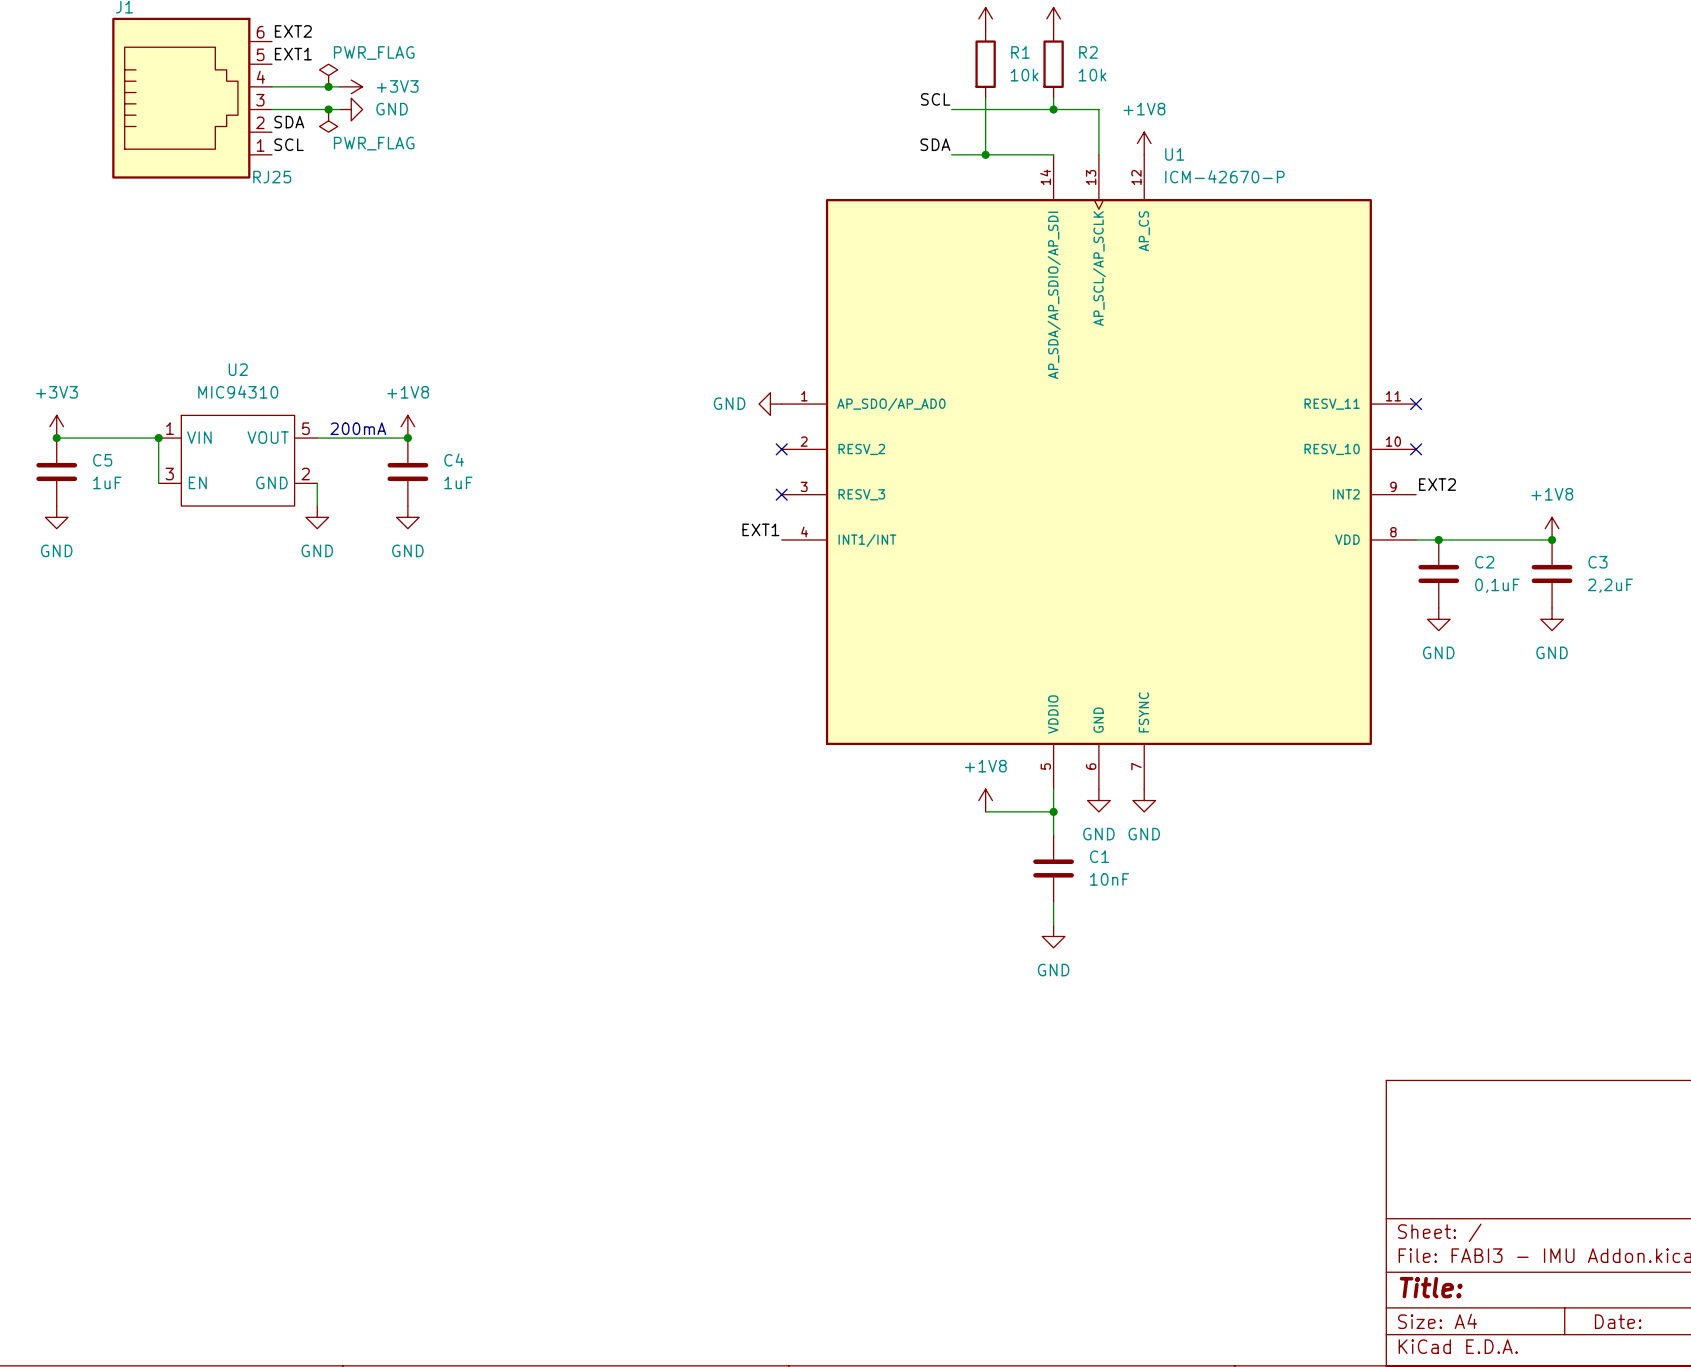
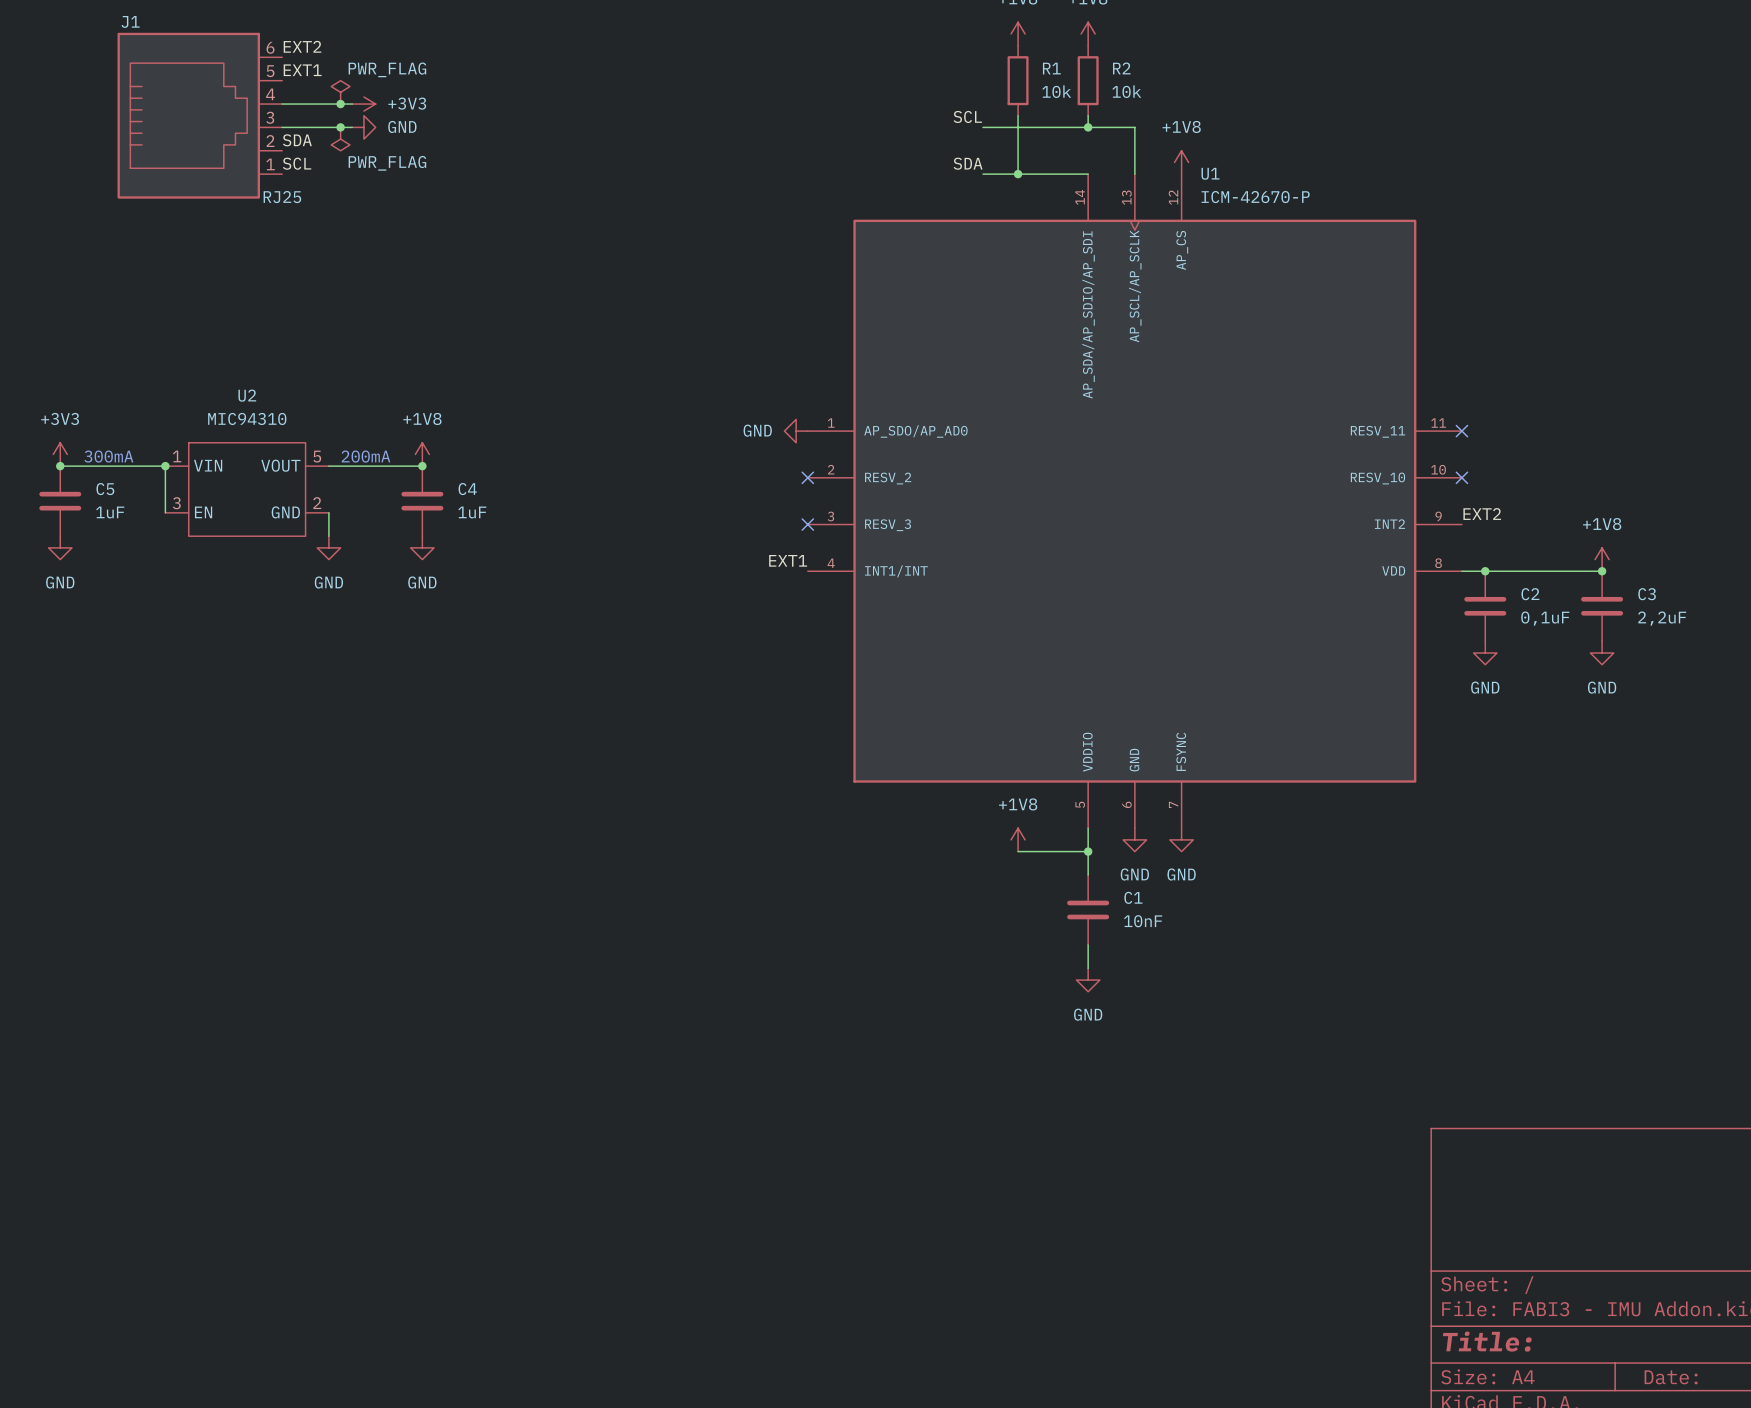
text: none -> 300mA (108, 456)

